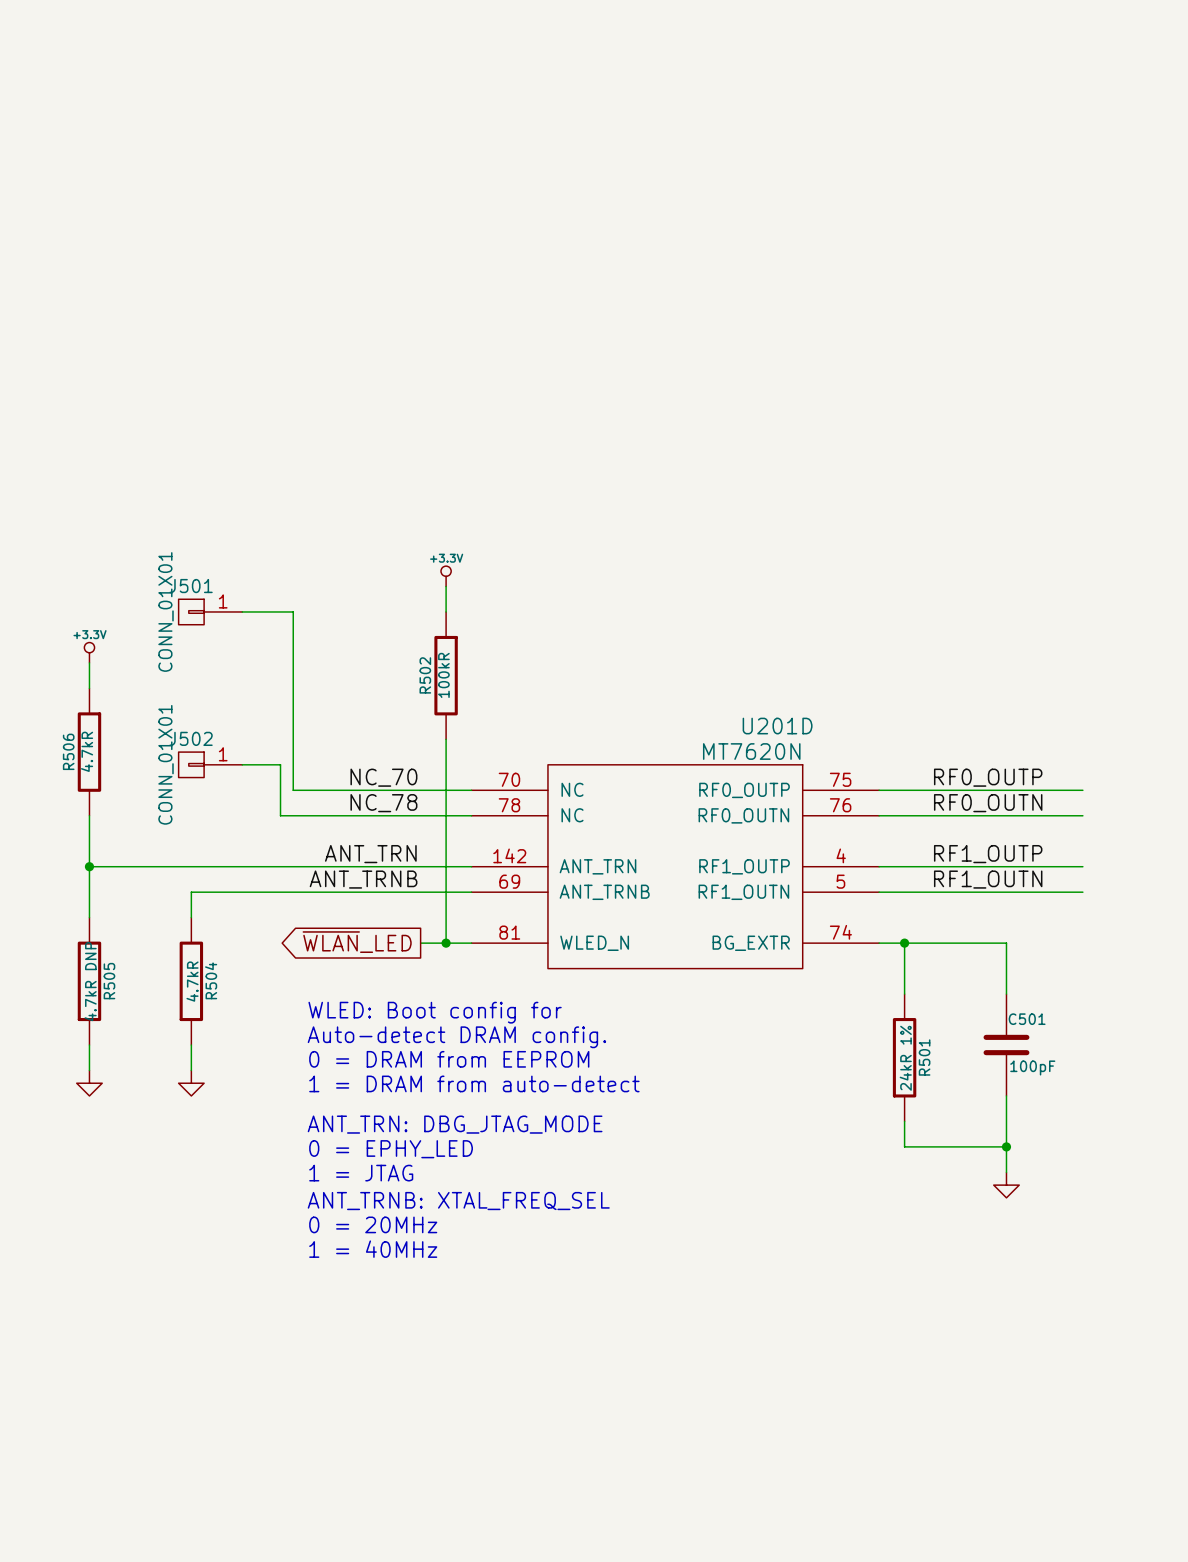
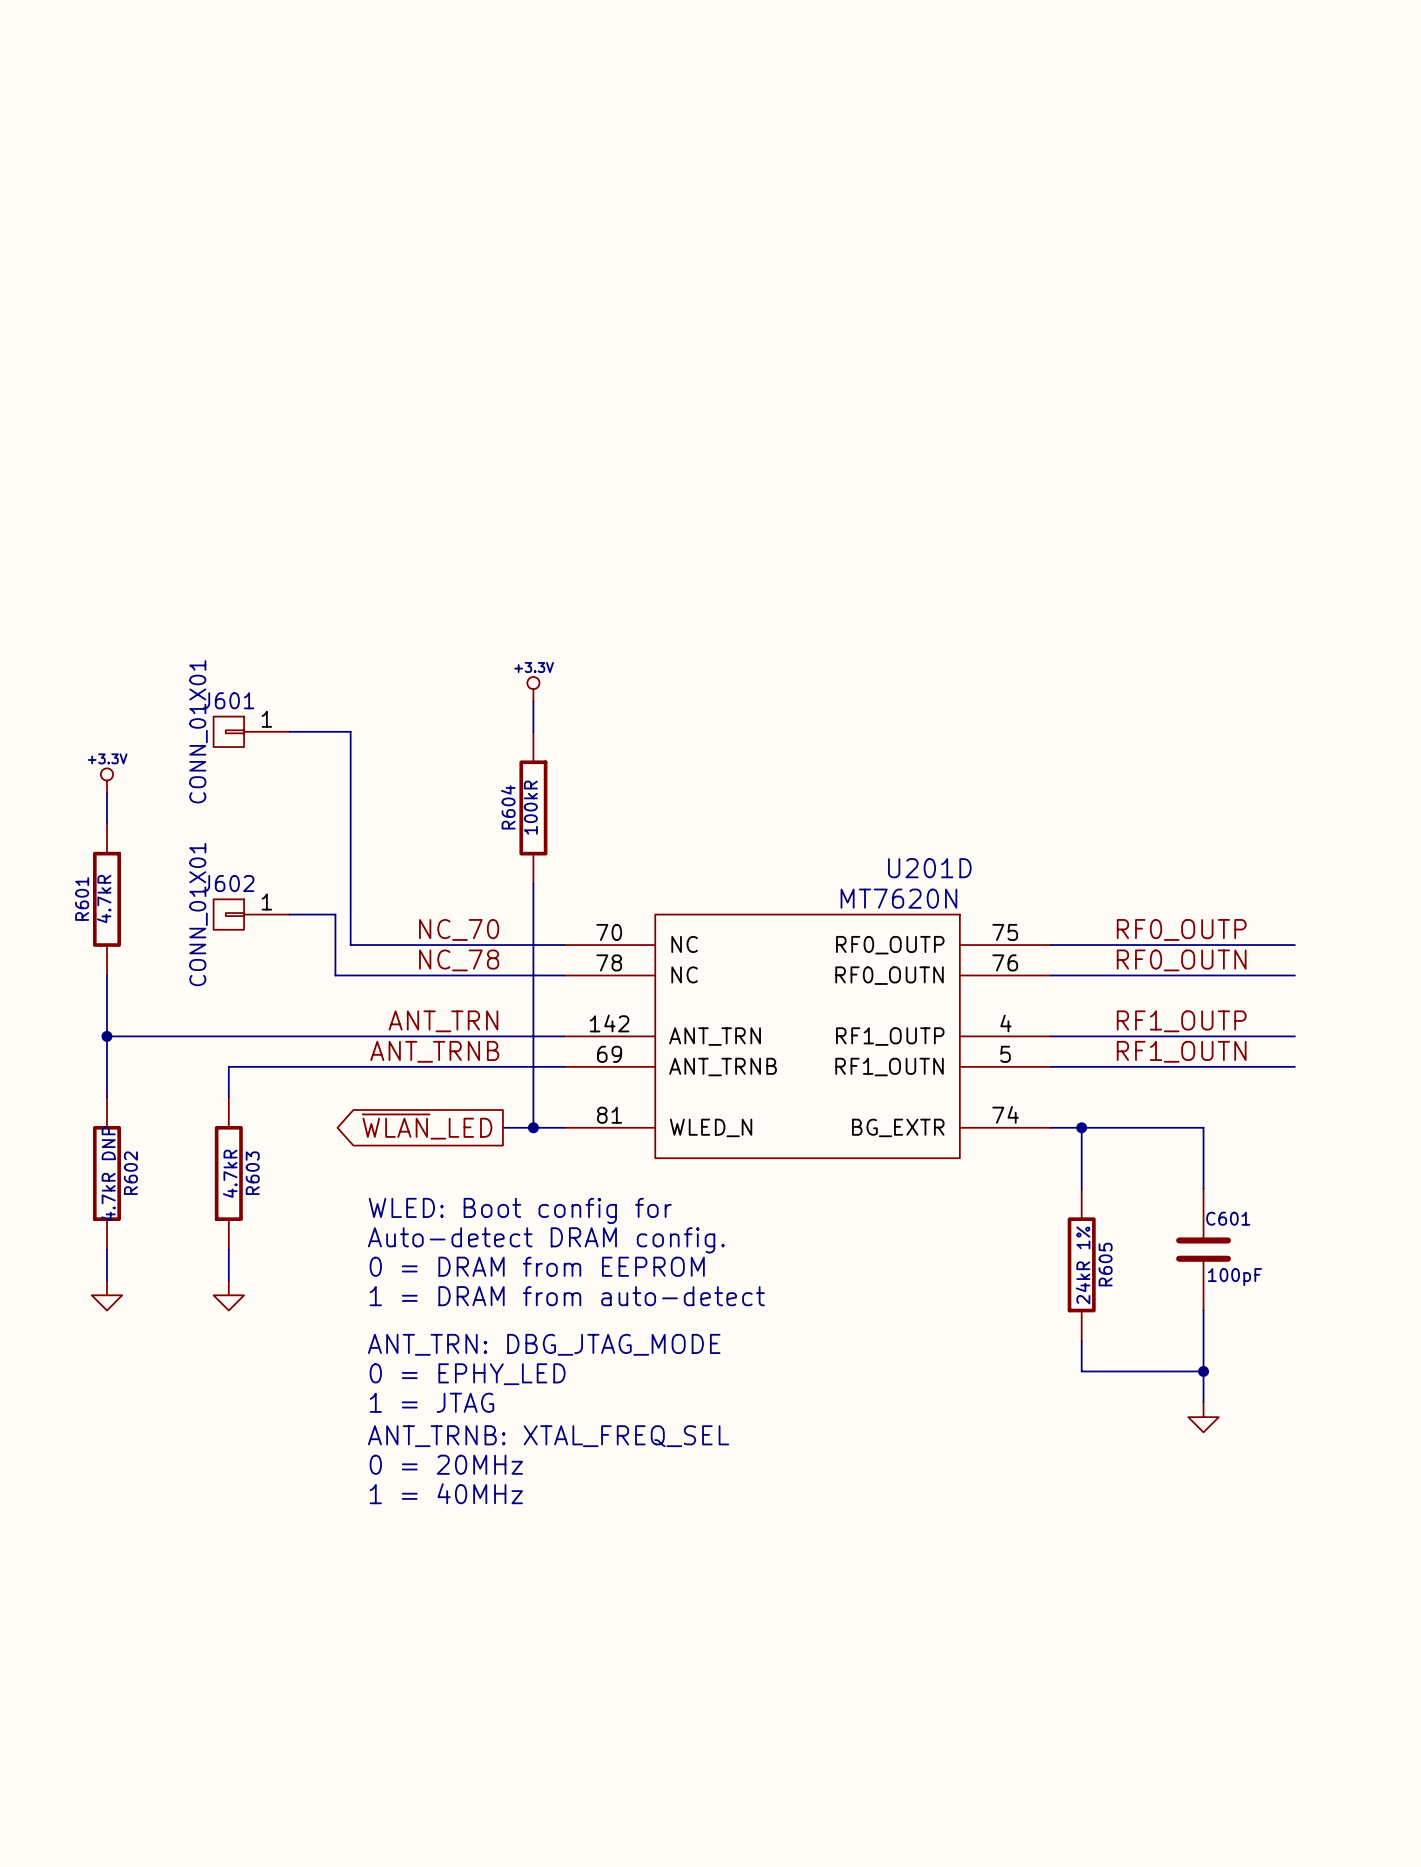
J501 name: J501 (191, 586) -> J601 (228, 700)
R502 name: R502 (425, 675) -> R604 (508, 807)
J502 name: J502 (191, 738) -> J602 (228, 883)
R506 name: R506 (68, 751) -> R601 (82, 899)
R504 name: R504 (211, 980) -> R603 (252, 1173)
R505 name: R505 (109, 981) -> R602 (130, 1173)
C501 name: C501 (1027, 1019) -> C601 (1228, 1218)
R501 name: R501 (924, 1057) -> R605 (1105, 1264)

